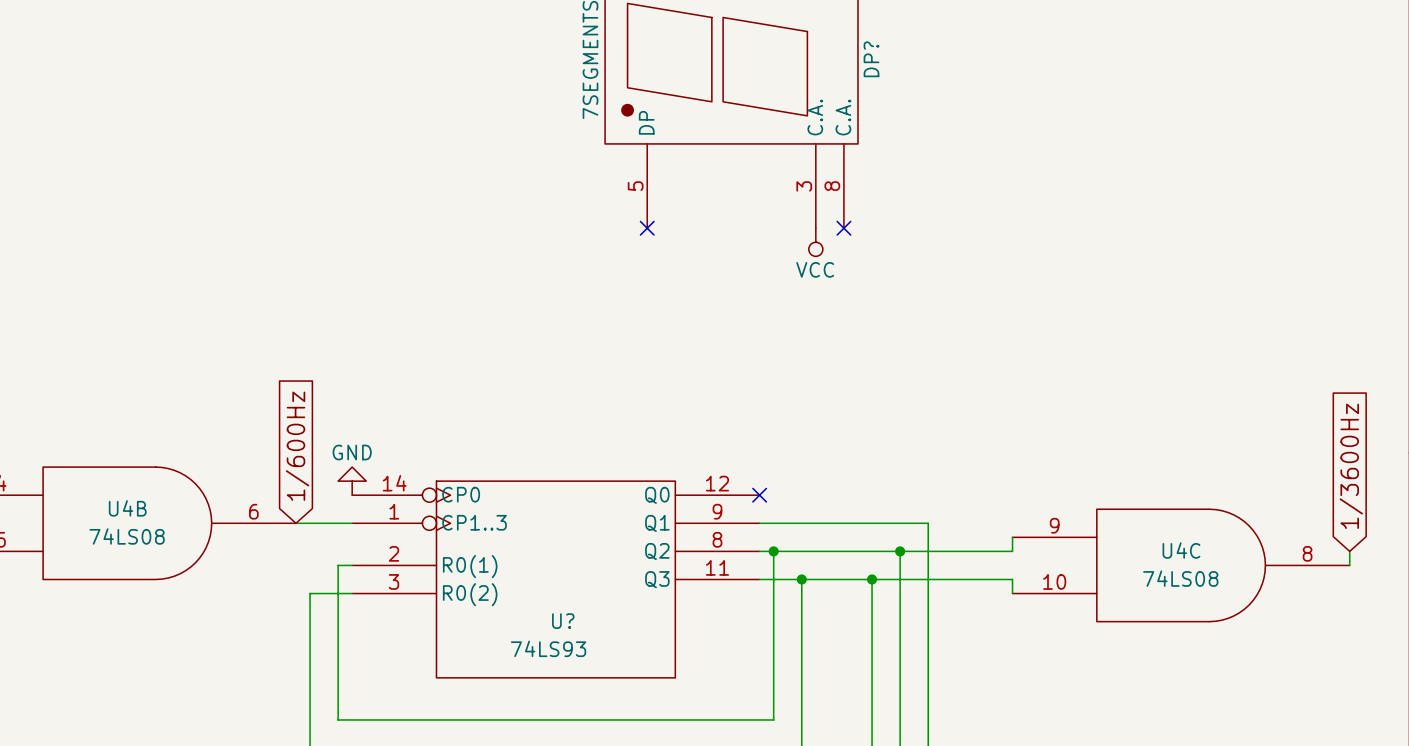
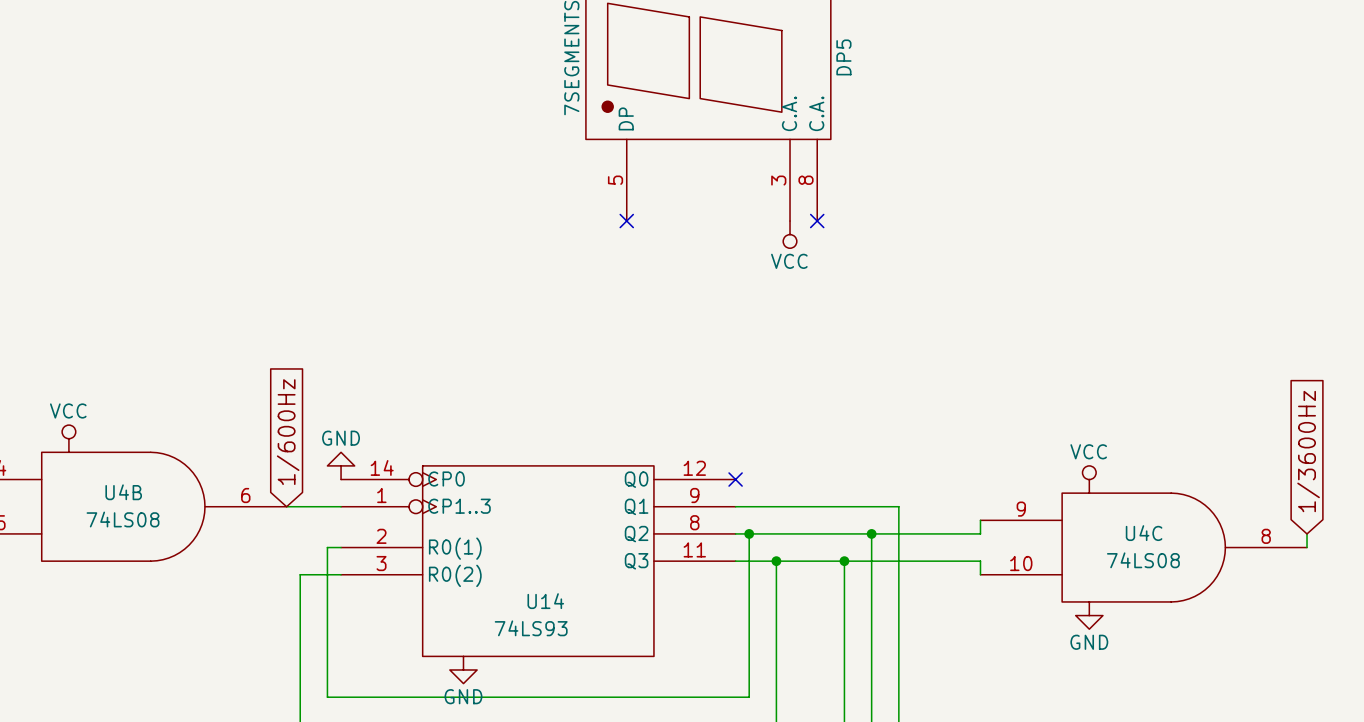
DP? name: DP? (871, 59) -> DP5 (843, 57)
power symbol: none -> VCC (68, 438)
power symbol: none -> VCC (1089, 479)
U? name: U? (563, 621) -> U14 (545, 601)
power symbol: none -> GND (1089, 615)
power symbol: none -> GND (463, 669)

